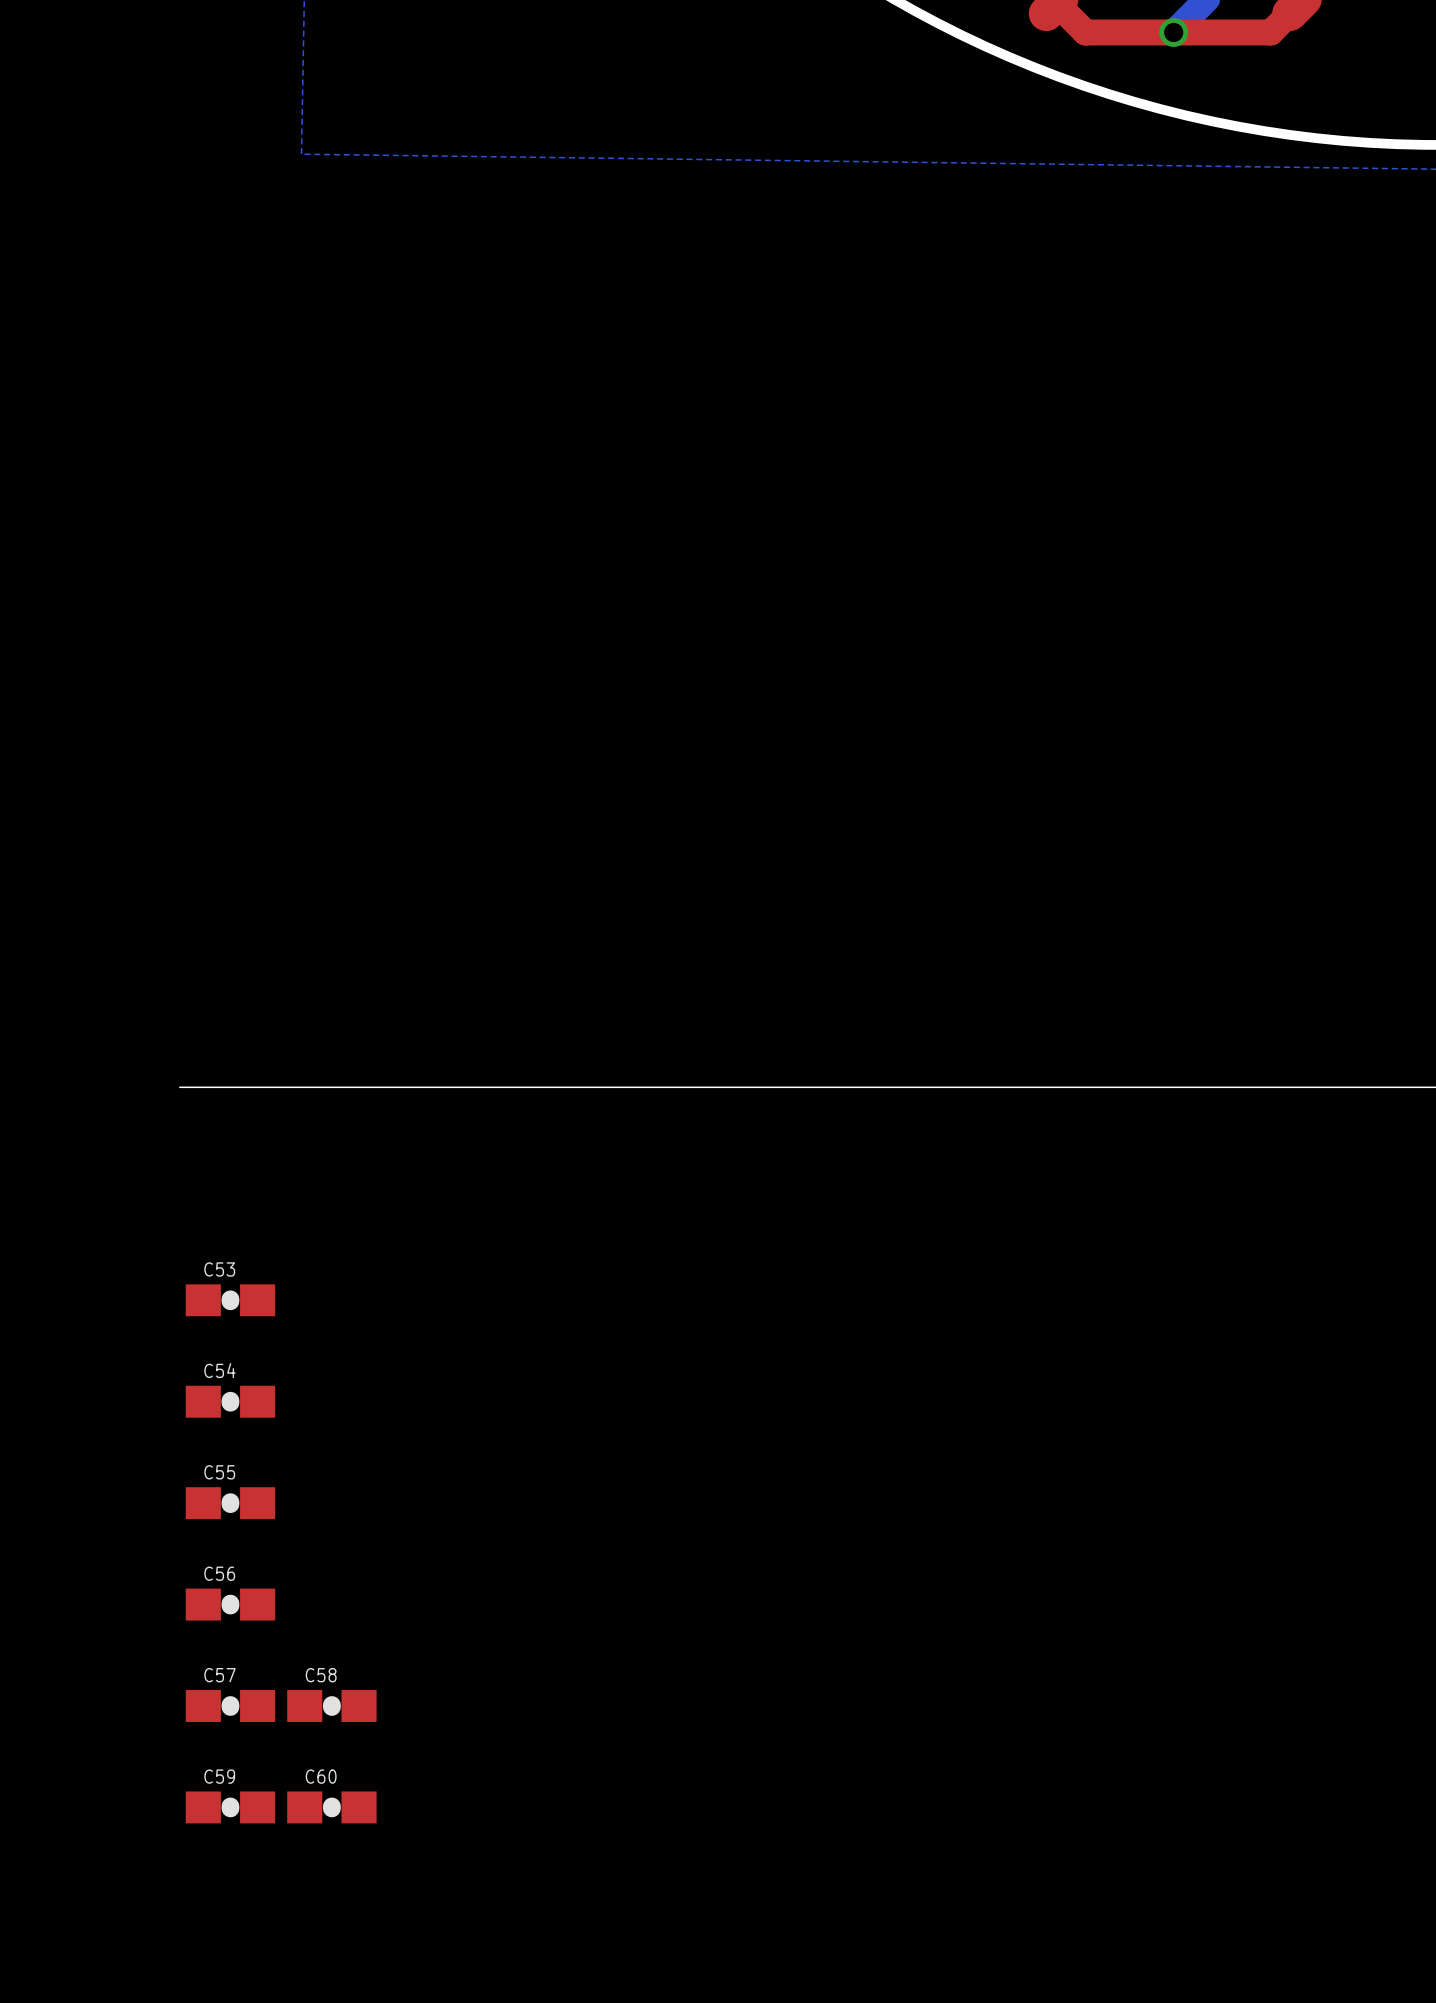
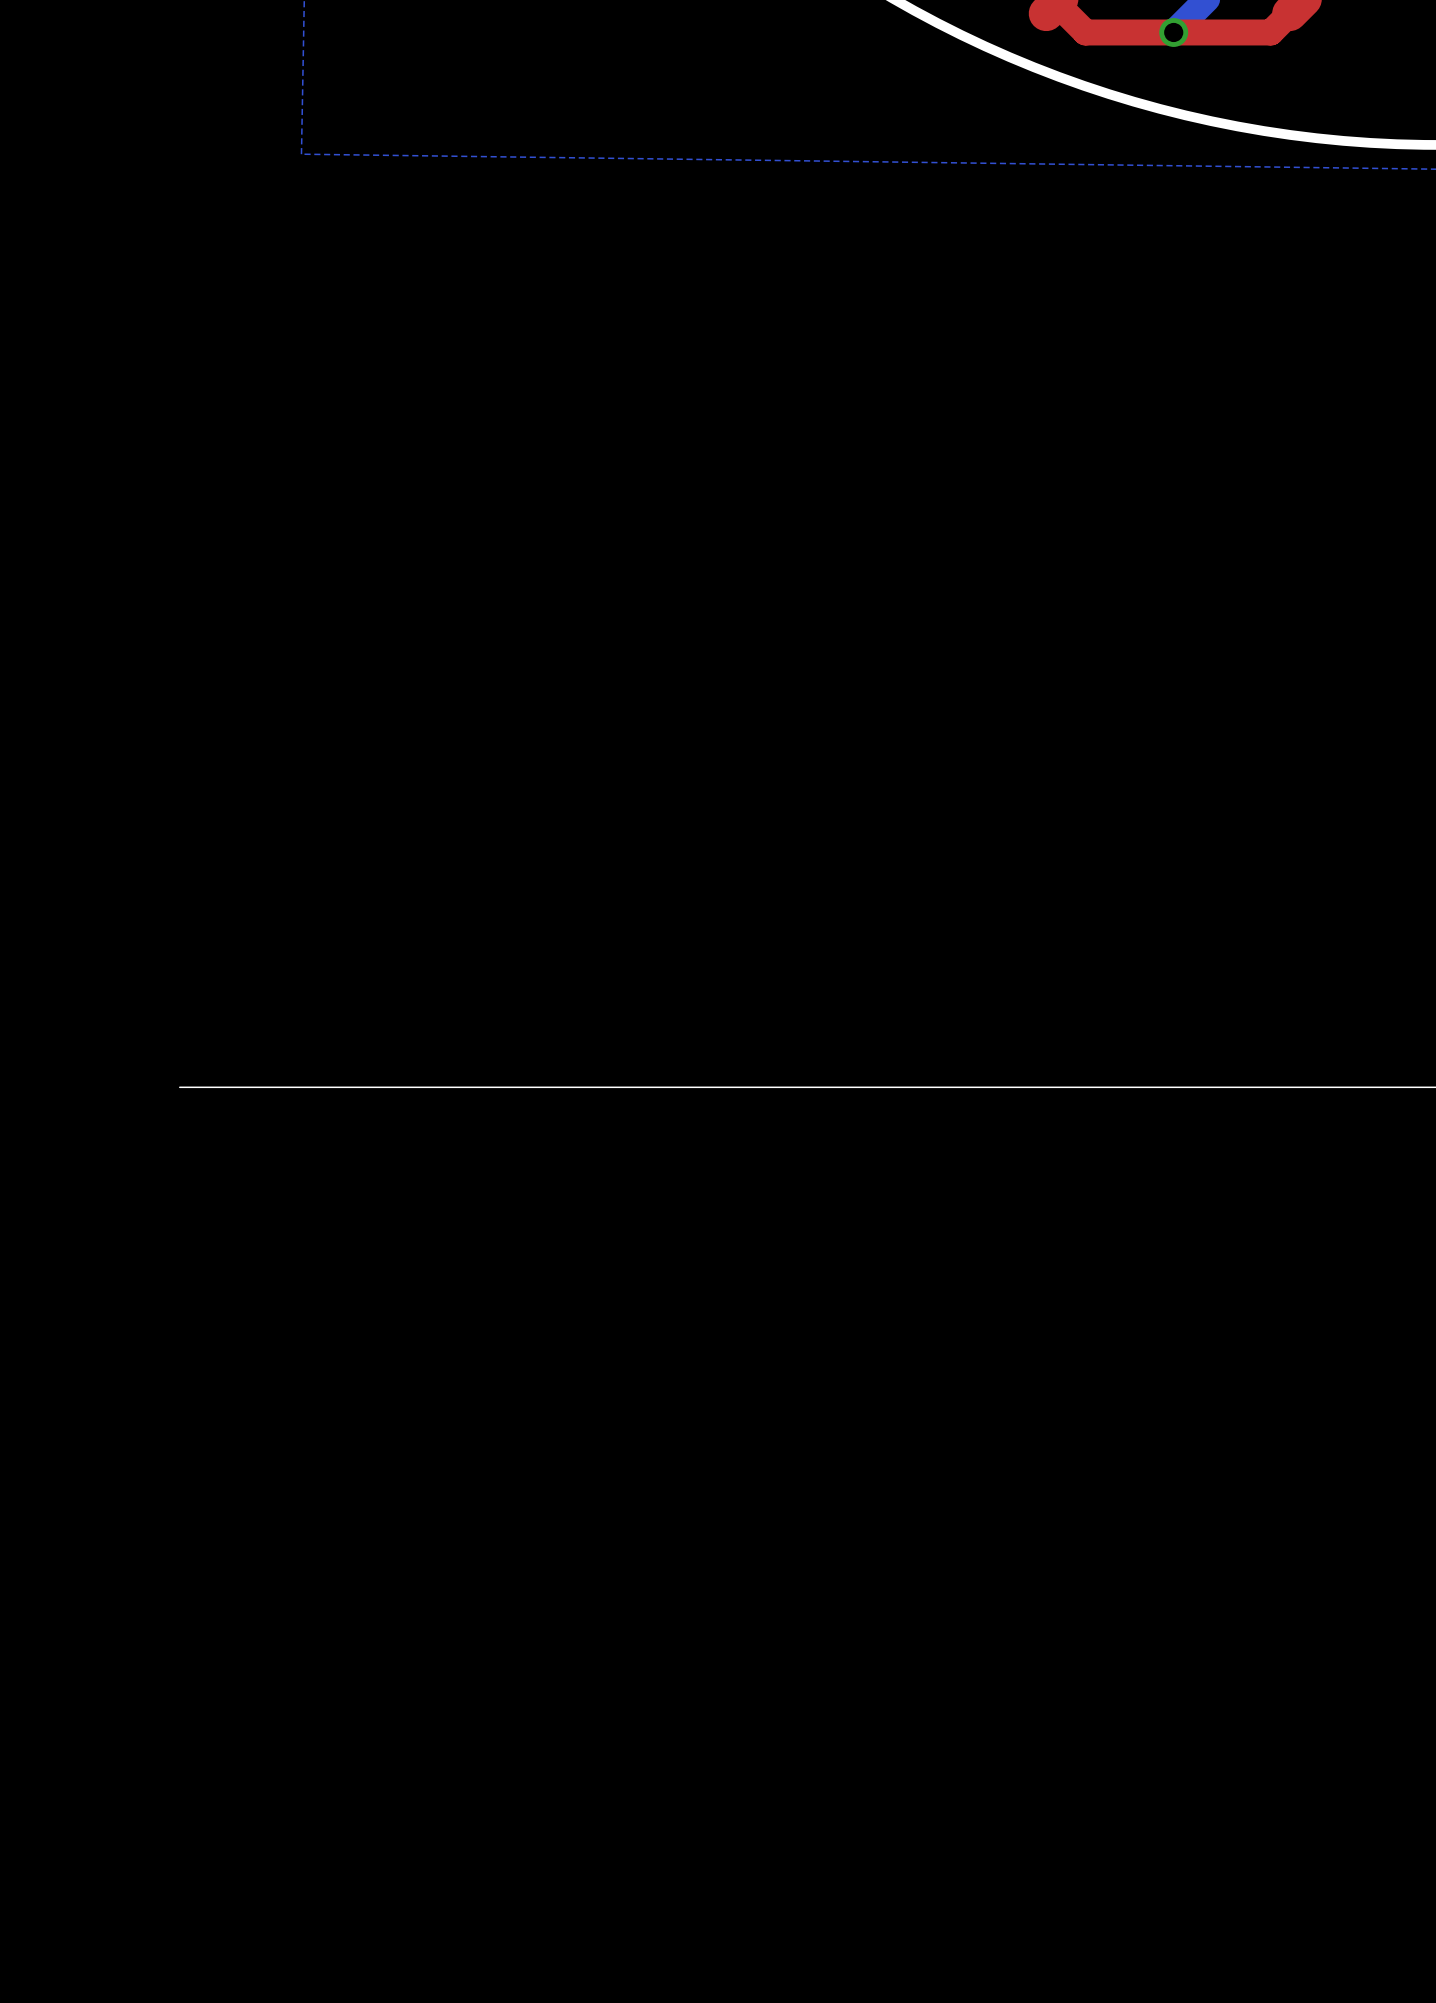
C53: (230, 1300) -> none
C54: (230, 1401) -> none
C55: (230, 1503) -> none
C56: (230, 1604) -> none
C57: (230, 1706) -> none
C58: (331, 1706) -> none
C59: (230, 1807) -> none
C60: (331, 1807) -> none

